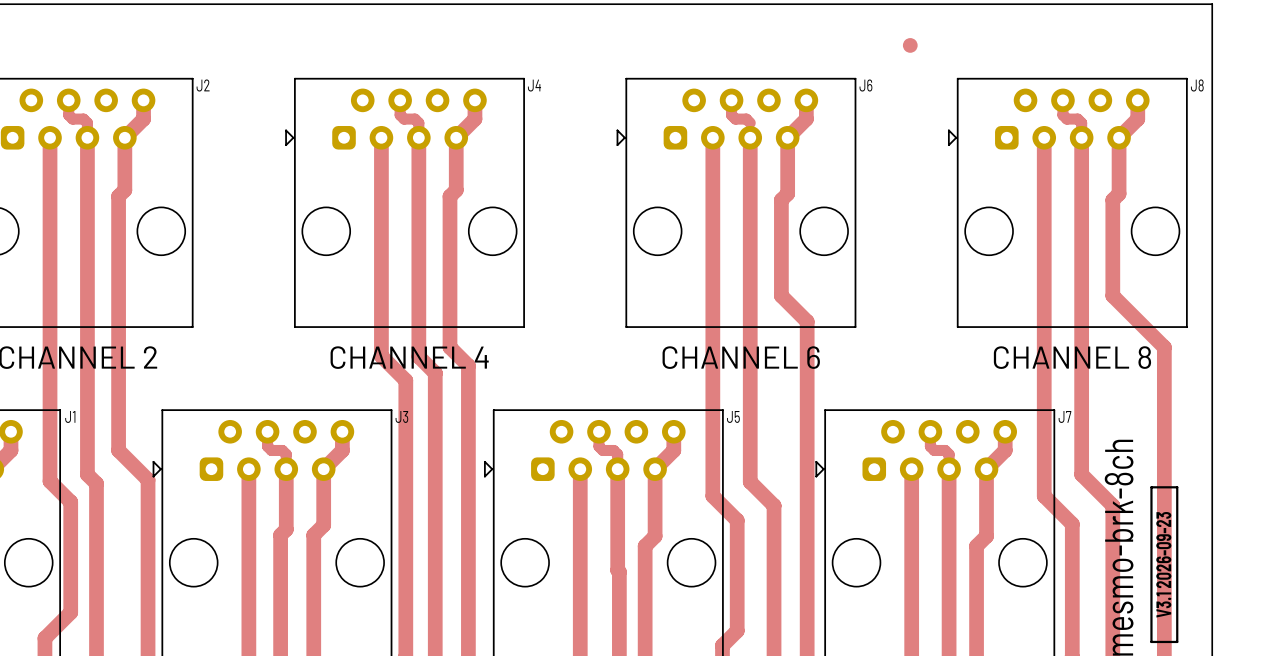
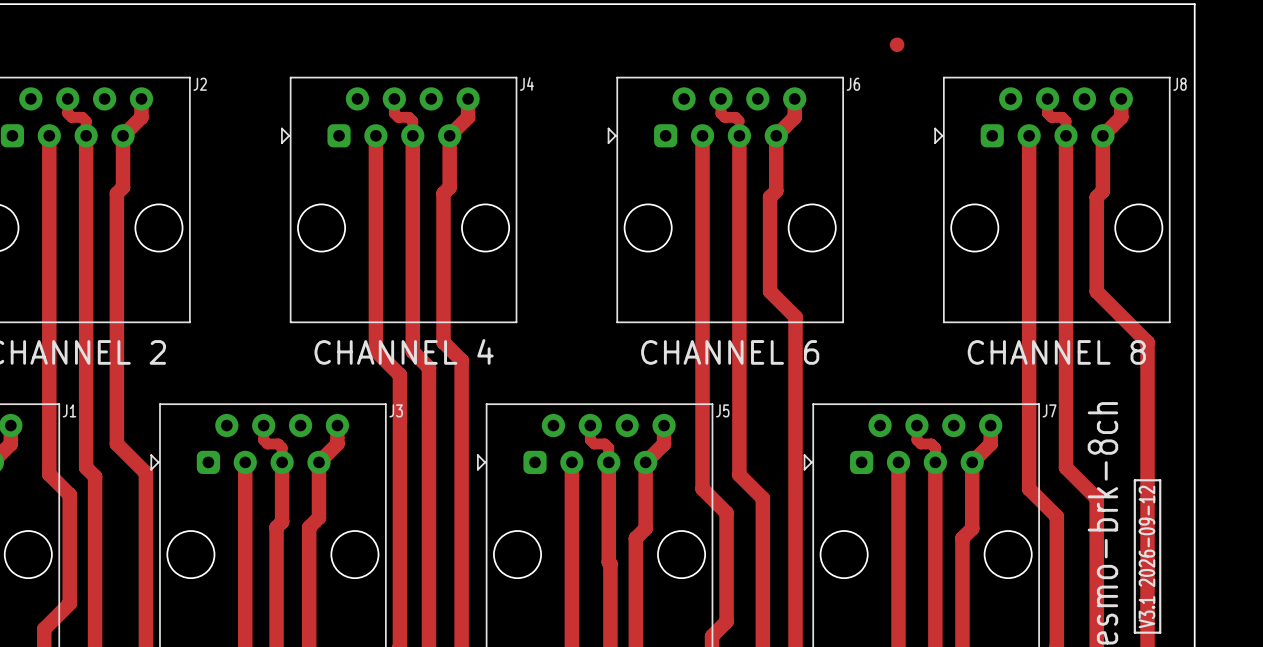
text: V3.1 2026-09-23 (1163, 564) -> V3.1 2026-09-12 (1146, 556)

